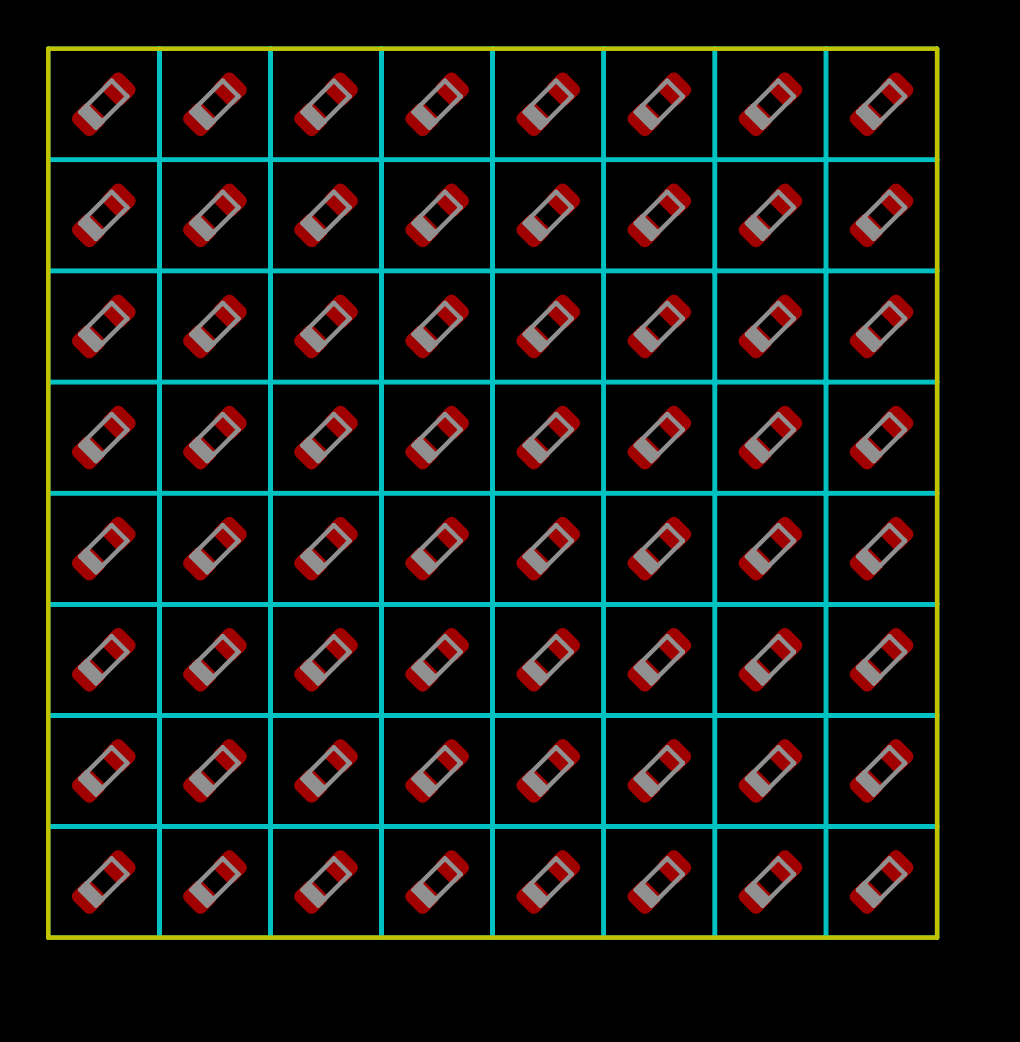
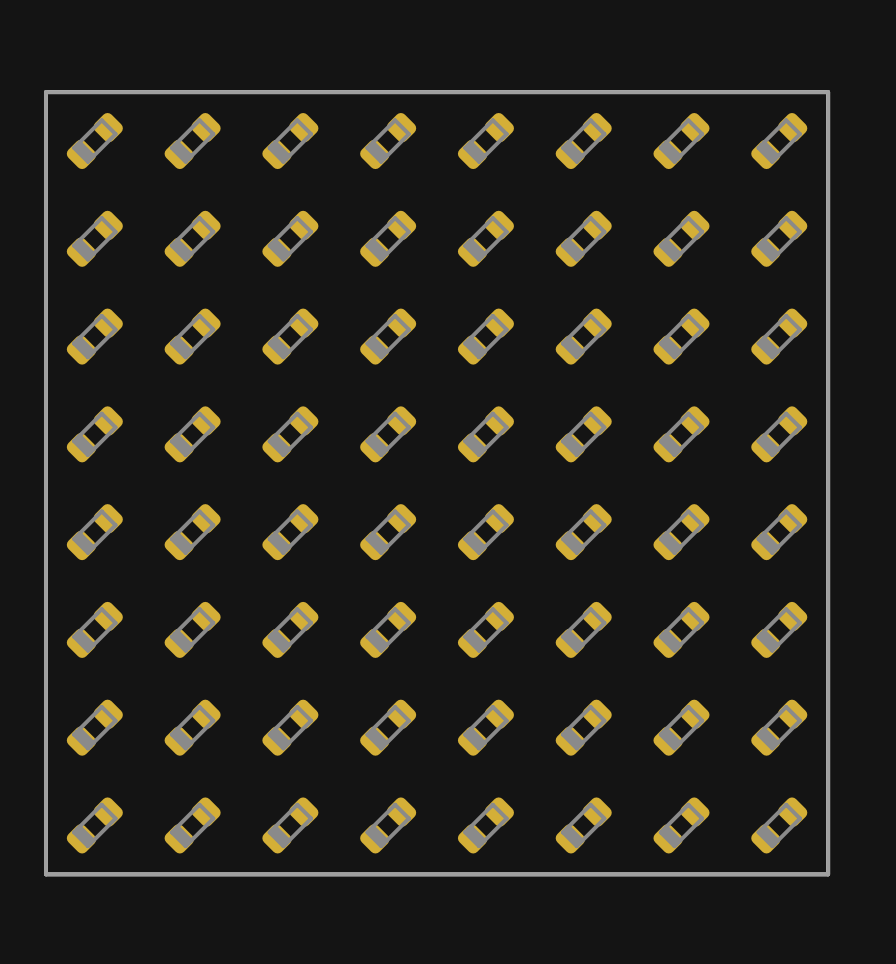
line: (159, 48) (159, 937) -> none
line: (270, 48) (270, 937) -> none
line: (381, 48) (381, 937) -> none
line: (492, 48) (492, 937) -> none
line: (603, 48) (603, 937) -> none
line: (714, 48) (714, 937) -> none
line: (826, 48) (826, 937) -> none
line: (48, 159) (937, 159) -> none
line: (48, 270) (937, 270) -> none
line: (48, 382) (937, 382) -> none
line: (48, 493) (937, 493) -> none
line: (48, 604) (937, 604) -> none
line: (48, 715) (937, 715) -> none
line: (48, 826) (937, 826) -> none

